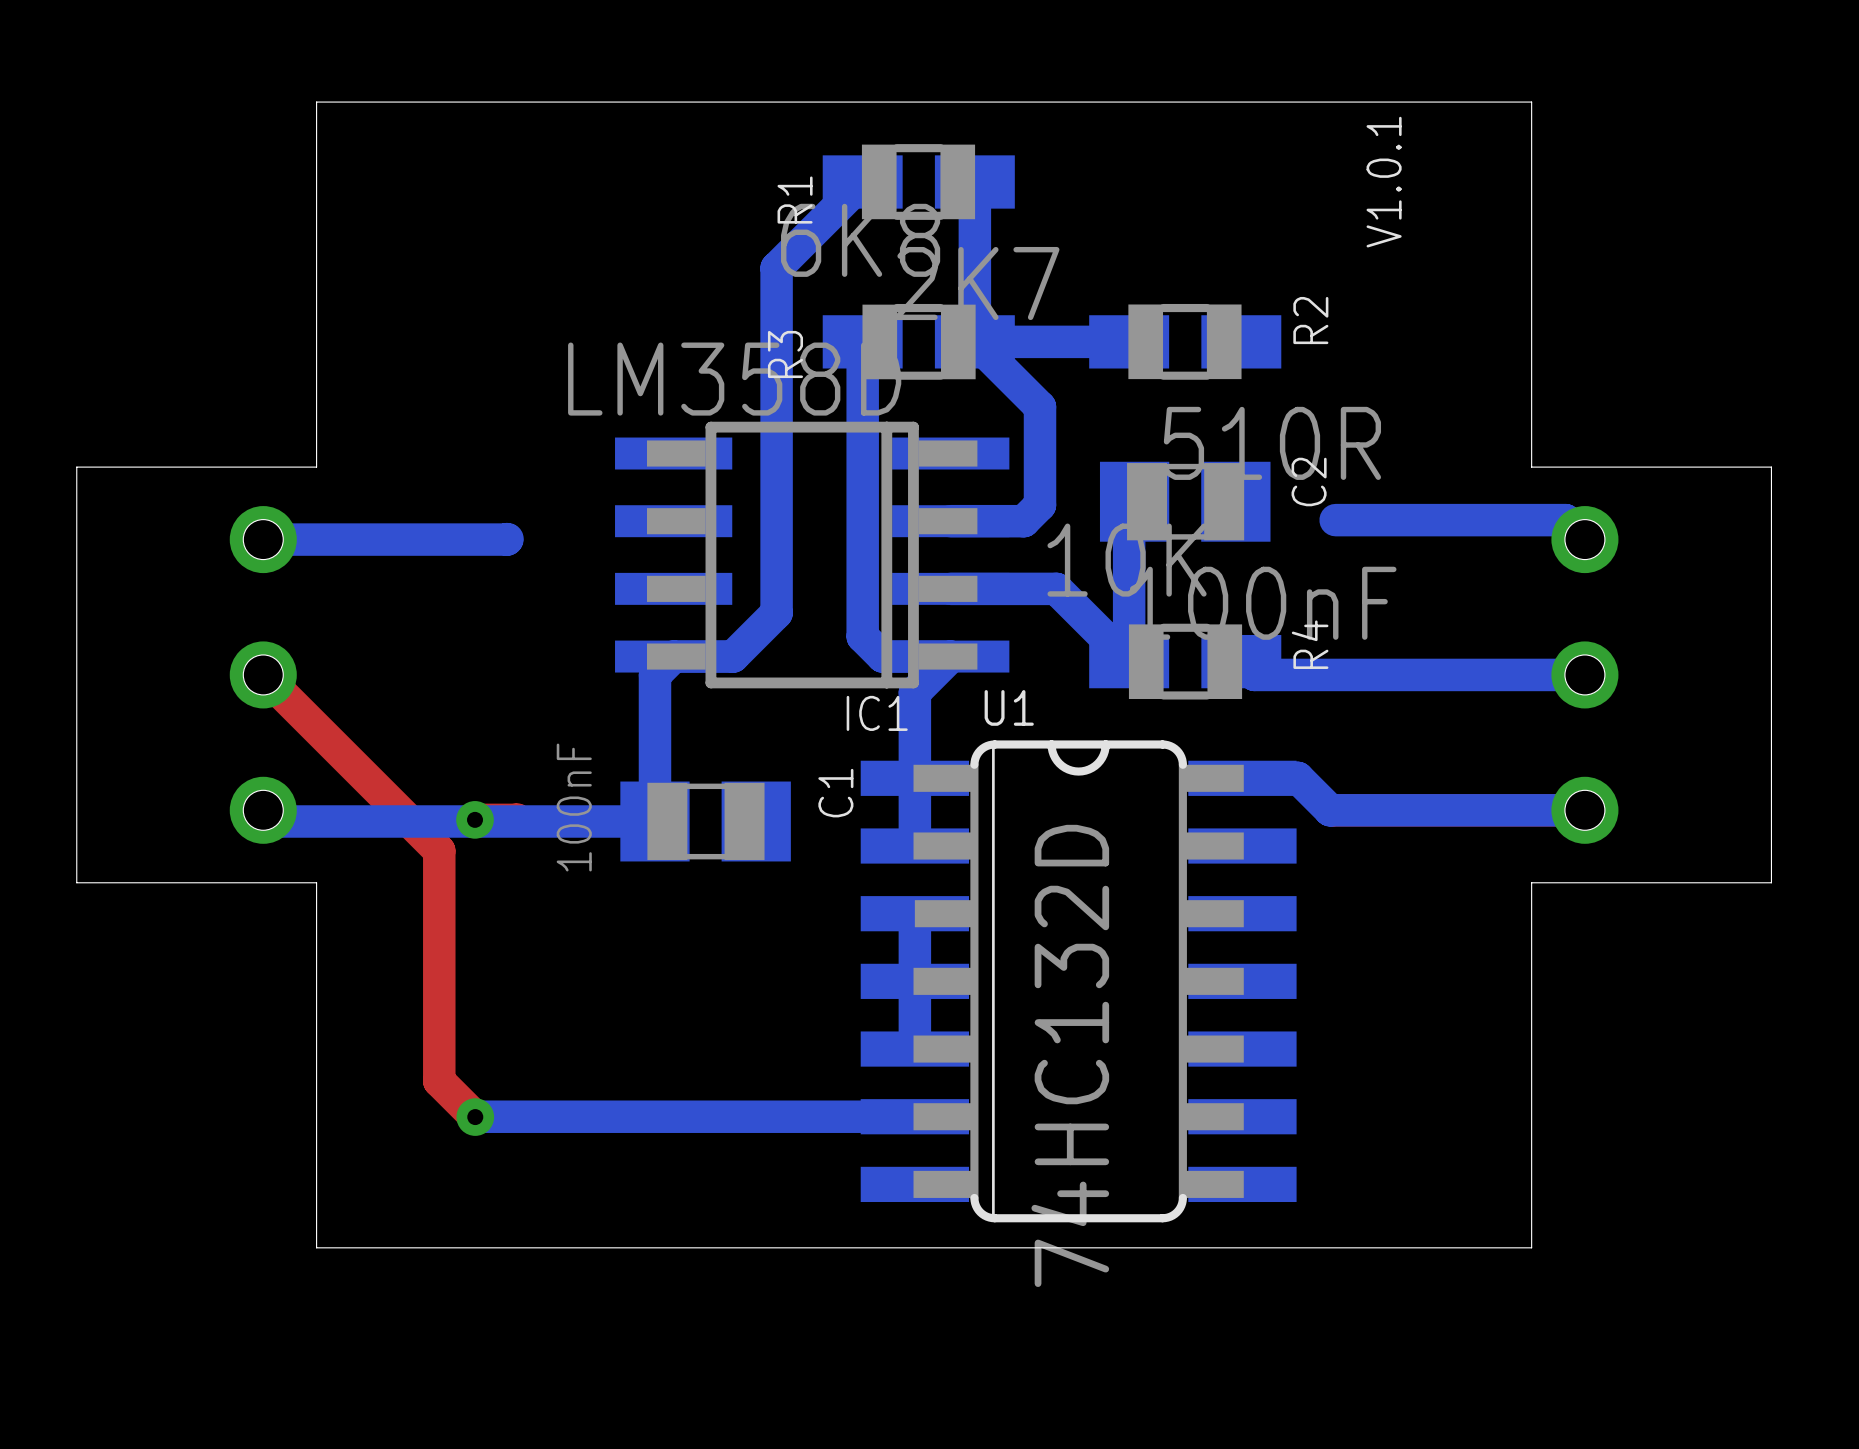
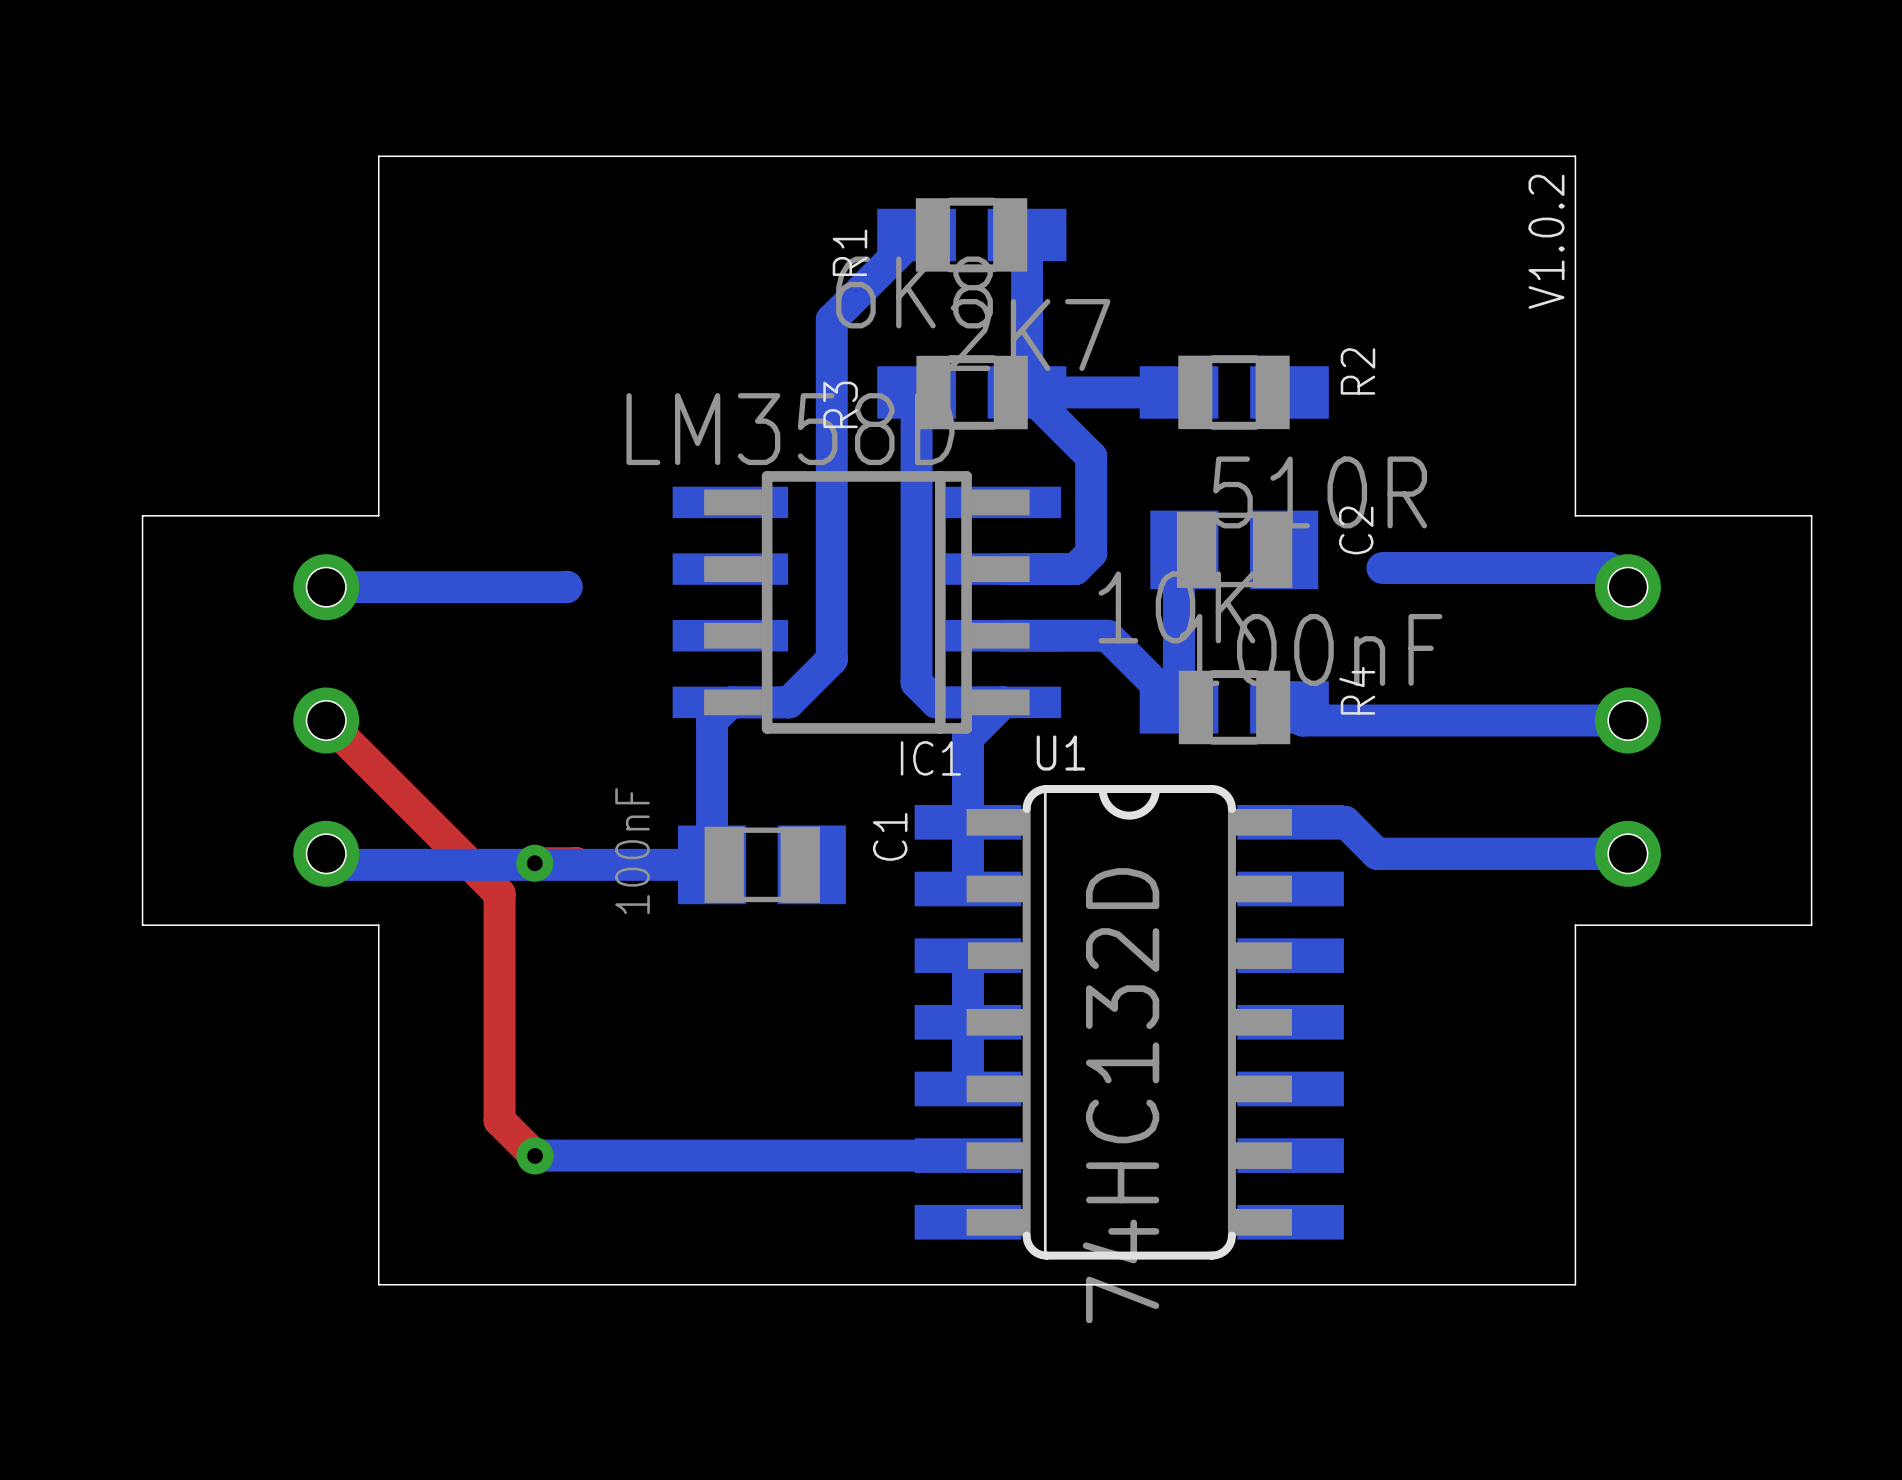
drawing: none -> [1528, 174, 1565, 309]
text: V1.0.1 (1384, 182) -> none

